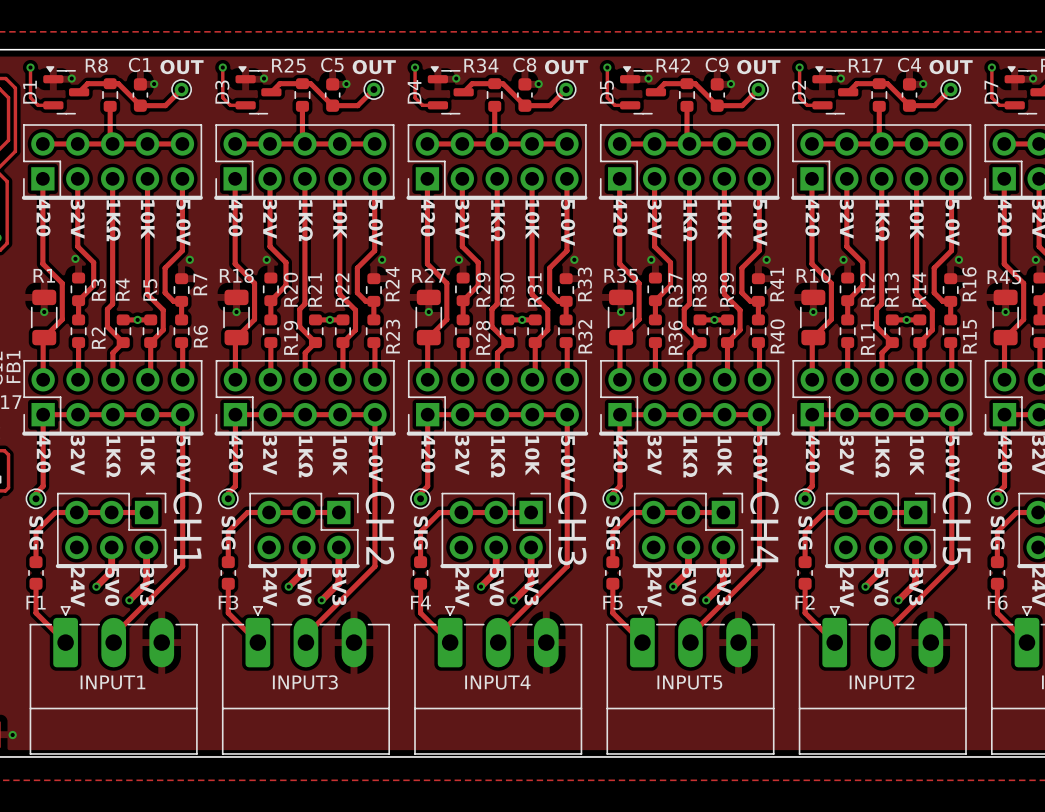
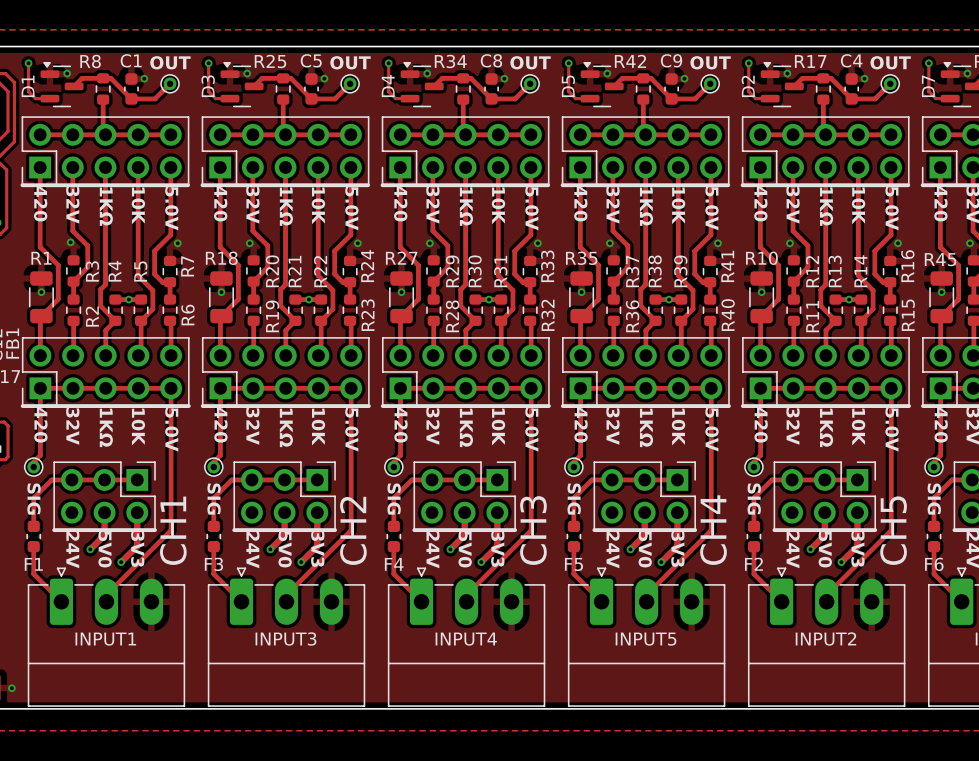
text rotation: 0° (187, 528) -> 180° (173, 530)
text rotation: 0° (379, 528) -> 180° (353, 530)
text rotation: 0° (572, 528) -> 180° (533, 530)
text rotation: 0° (956, 528) -> 180° (893, 530)
text rotation: 0° (764, 529) -> 180° (713, 530)

